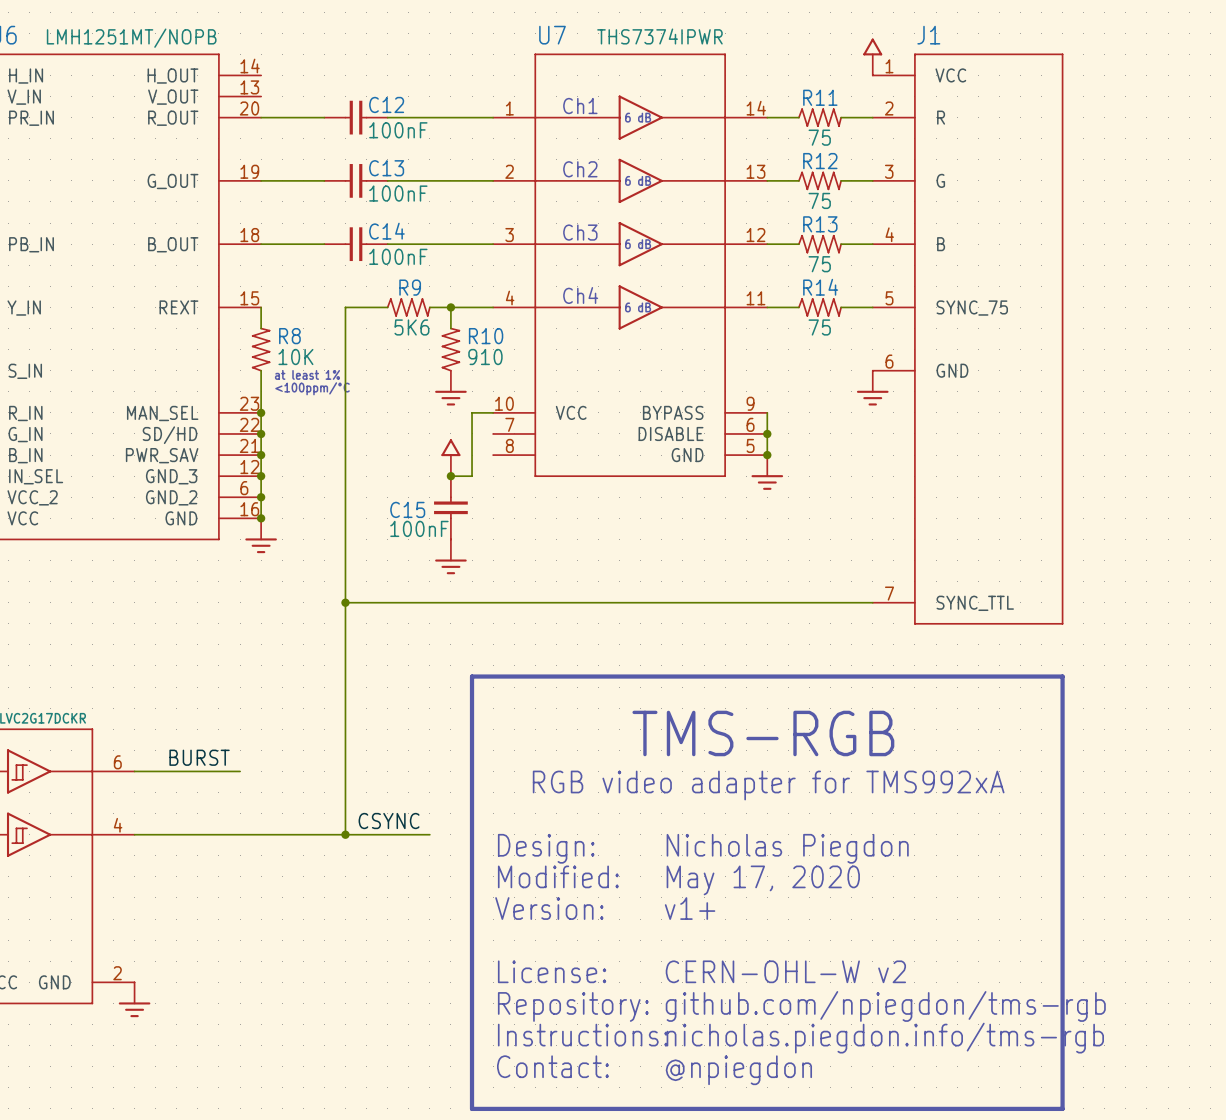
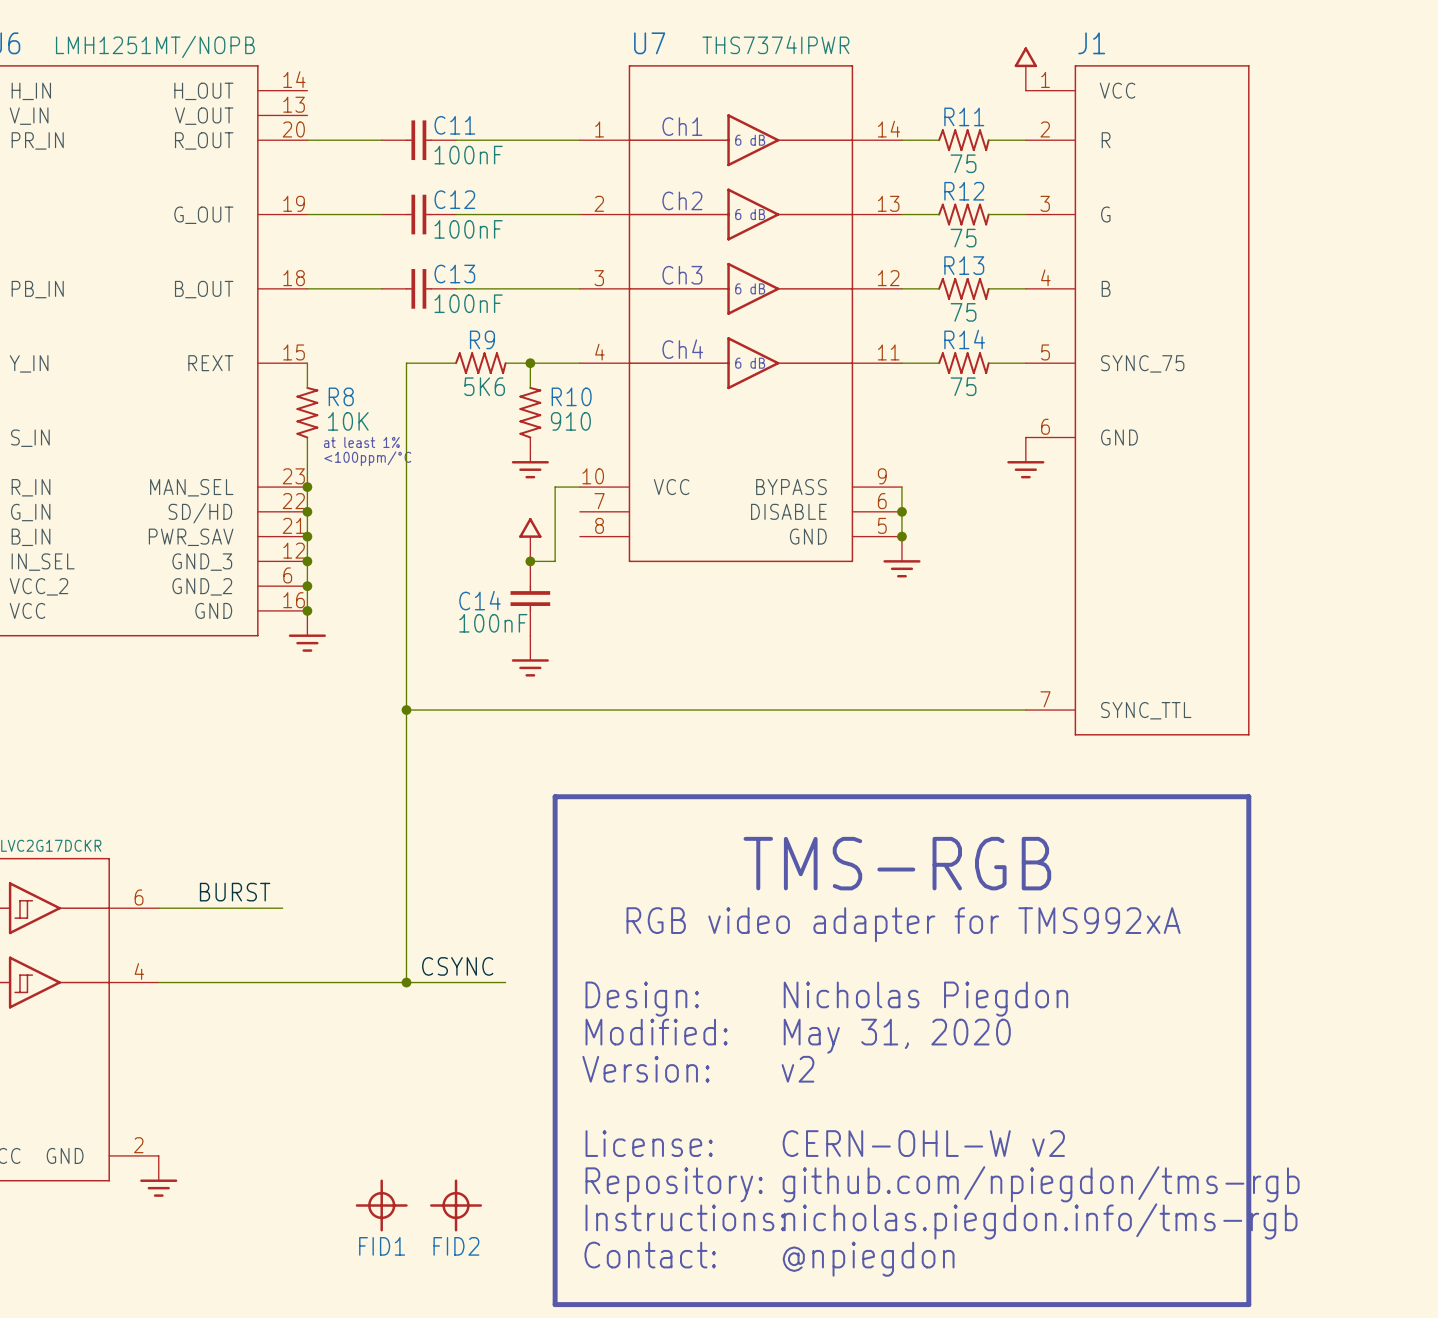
C12 name: C12 (386, 104) -> C11 (454, 125)
C13 name: C13 (386, 168) -> C12 (454, 199)
C14 name: C14 (386, 231) -> C13 (454, 274)
C15 name: C15 (407, 509) -> C14 (479, 600)
text: May 17, 2020 (763, 880) -> May 31, 2020 (897, 1036)
text: v1+ (690, 908) -> v2 (797, 1069)
FID1: none -> (381, 1205)
FID2: none -> (456, 1205)

